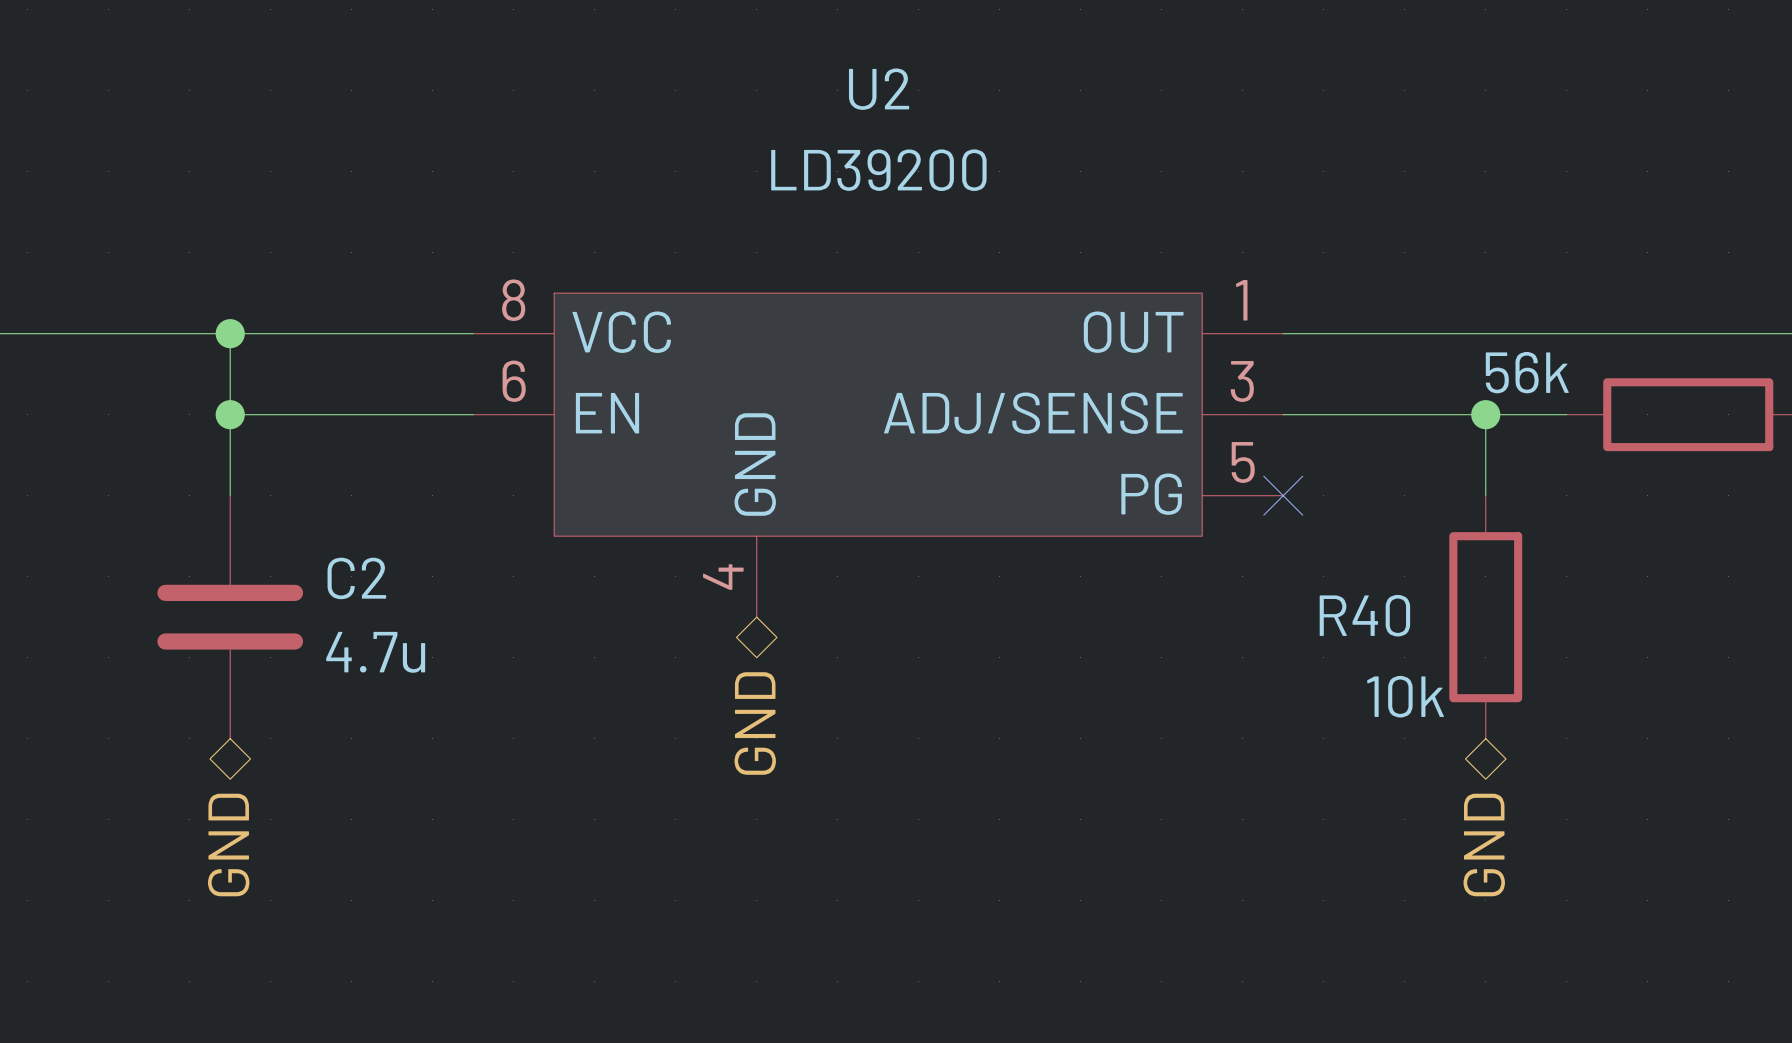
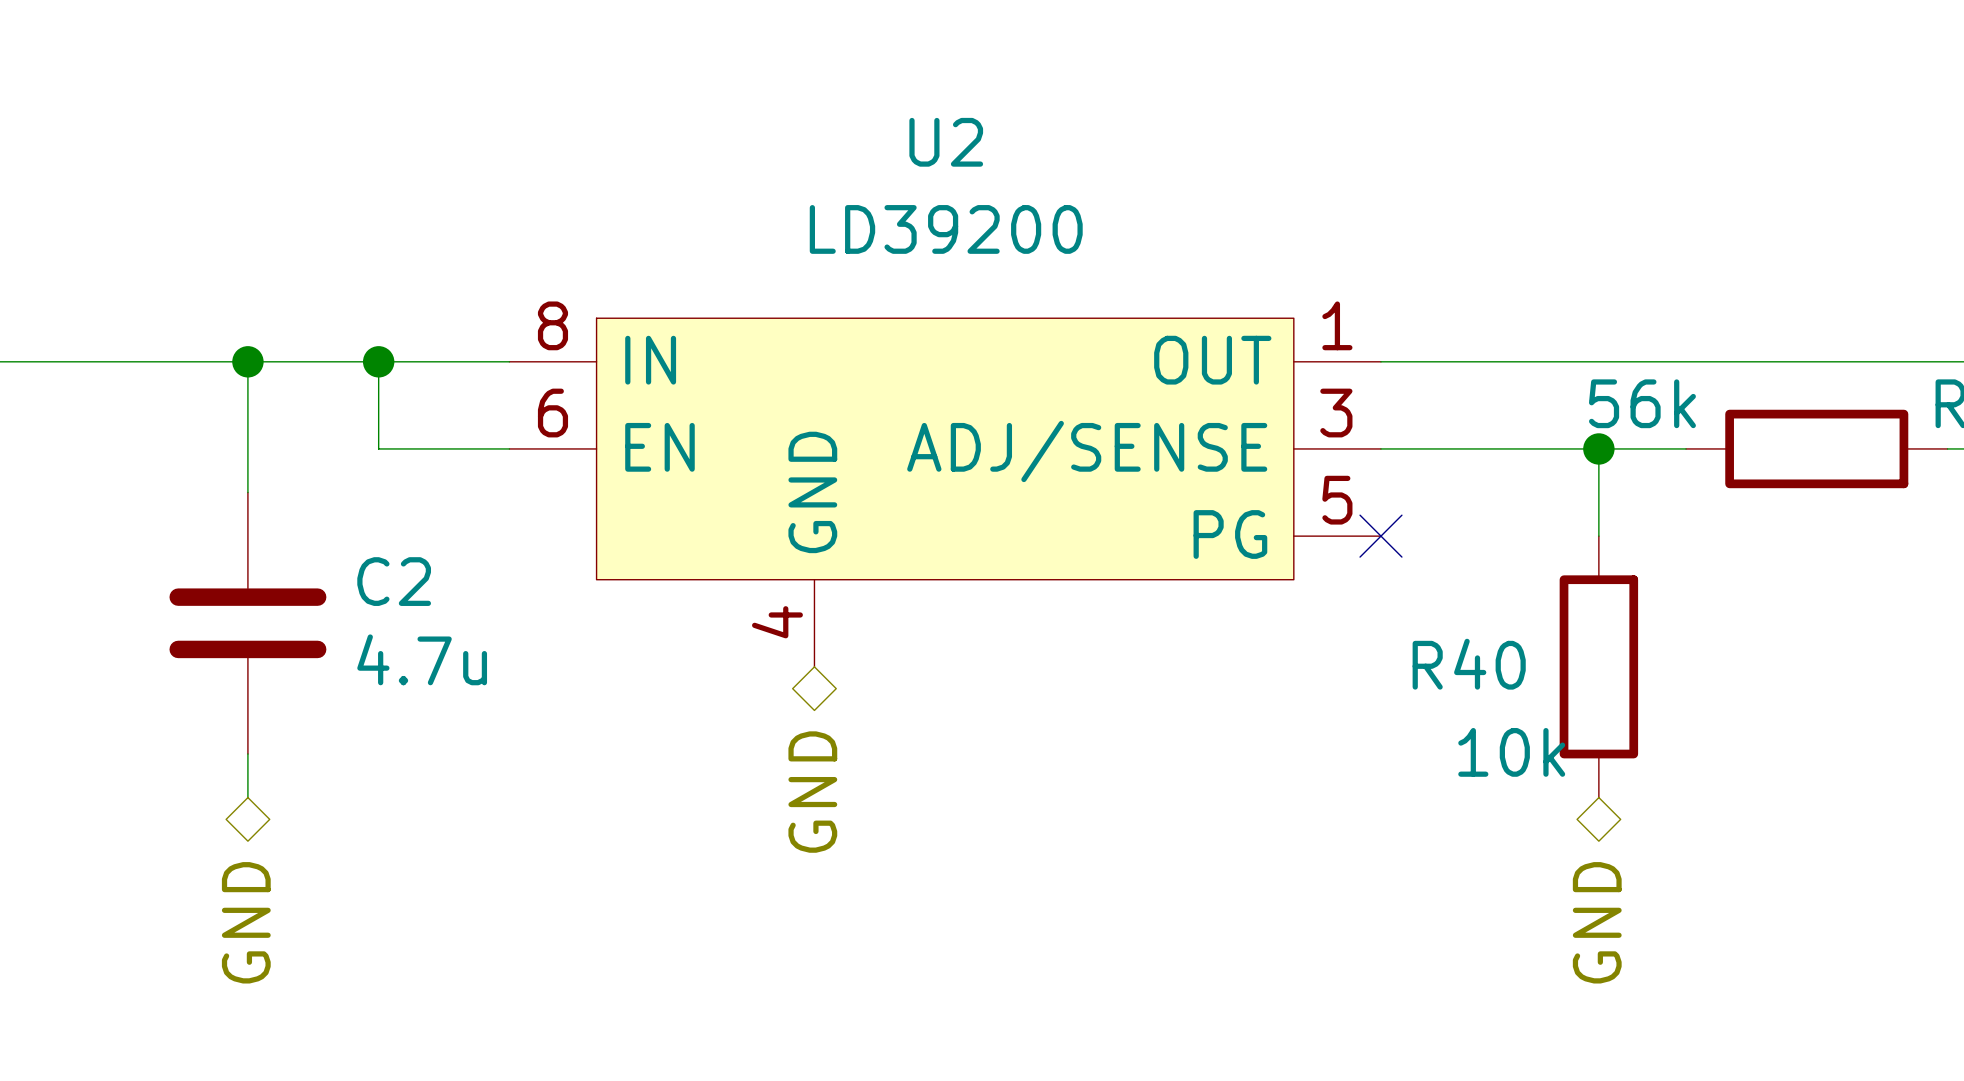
U2 name position: U2 (879, 89) -> U2 (946, 142)
U2 value position: LD39200 (878, 170) -> LD39200 (946, 229)
U2 pin name: VCC (621, 332) -> IN (650, 360)
wire: (230, 414) (351, 414) -> (378, 361) (378, 448)
junction position: (230, 414) -> (378, 361)
C2 position: (230, 617) -> (247, 623)

